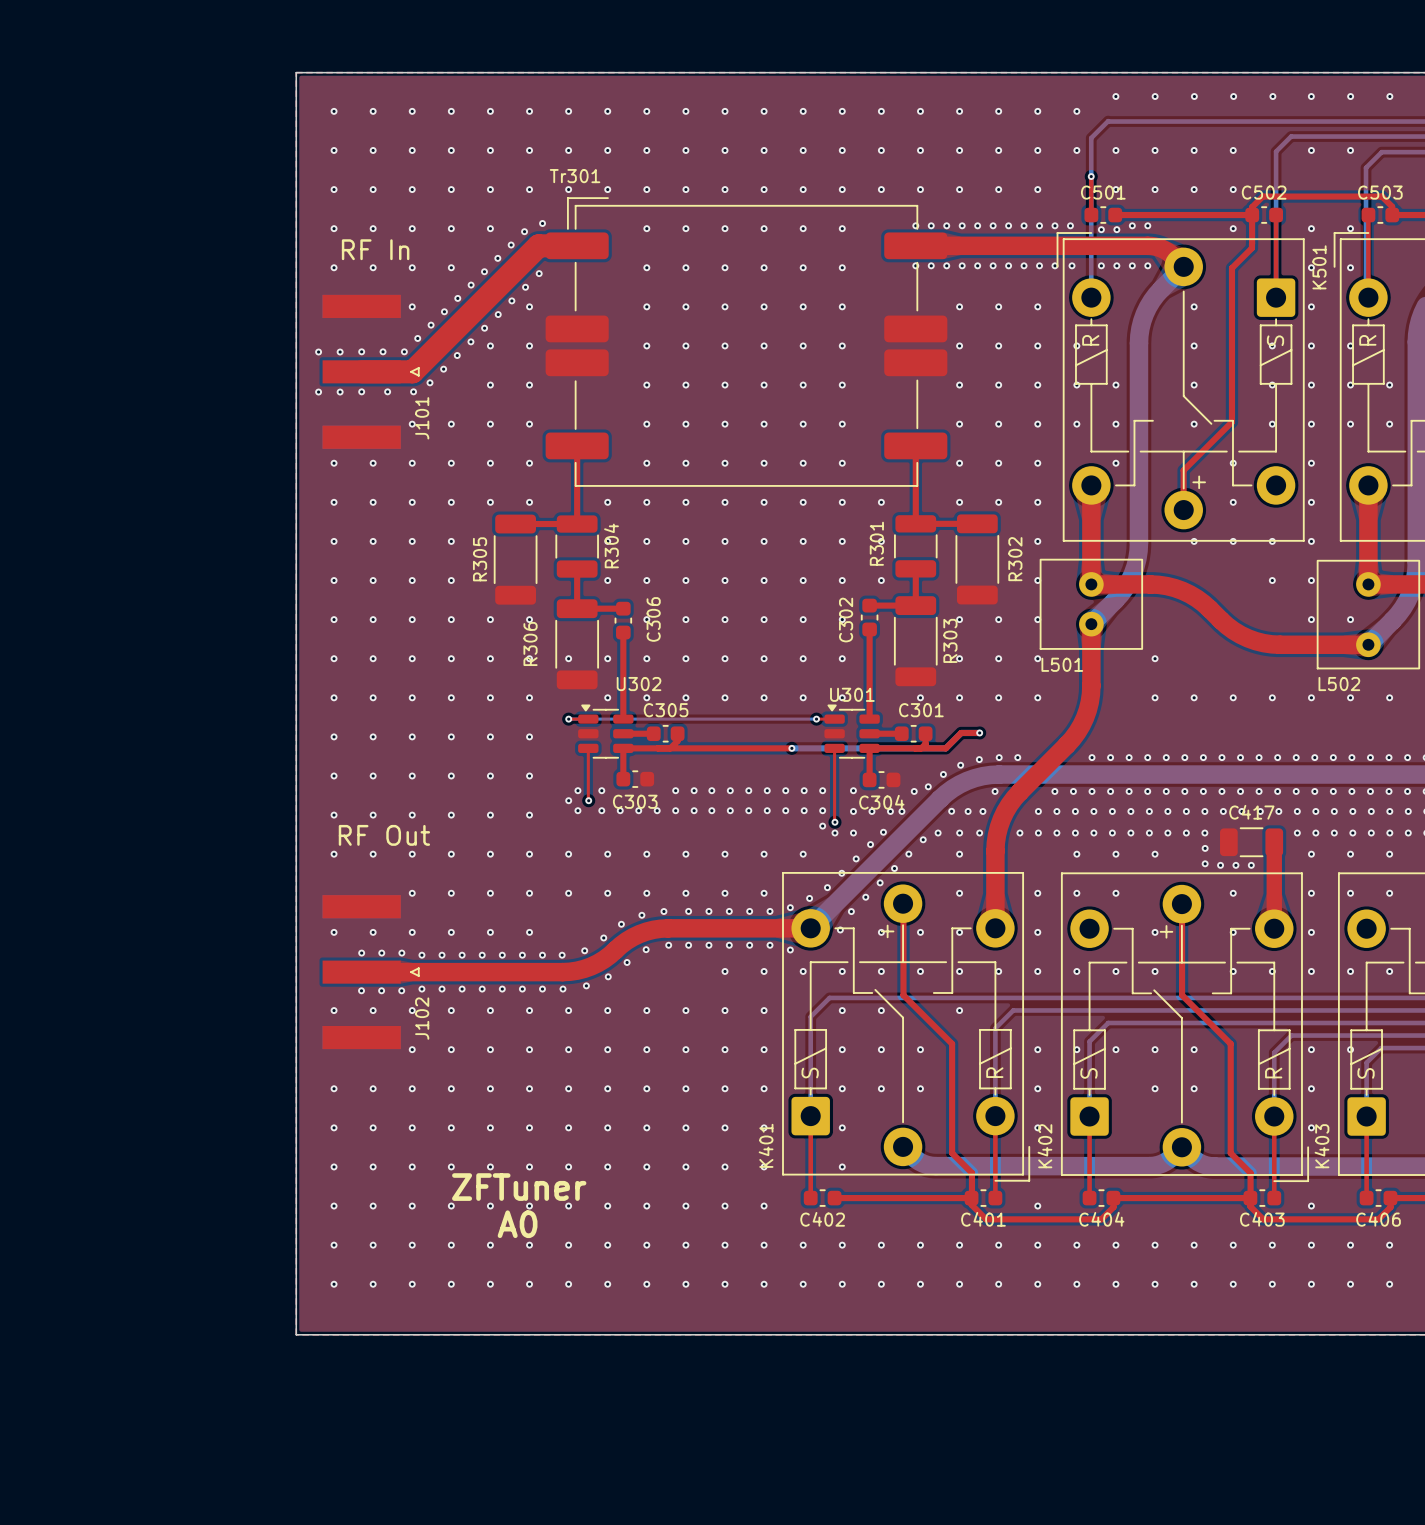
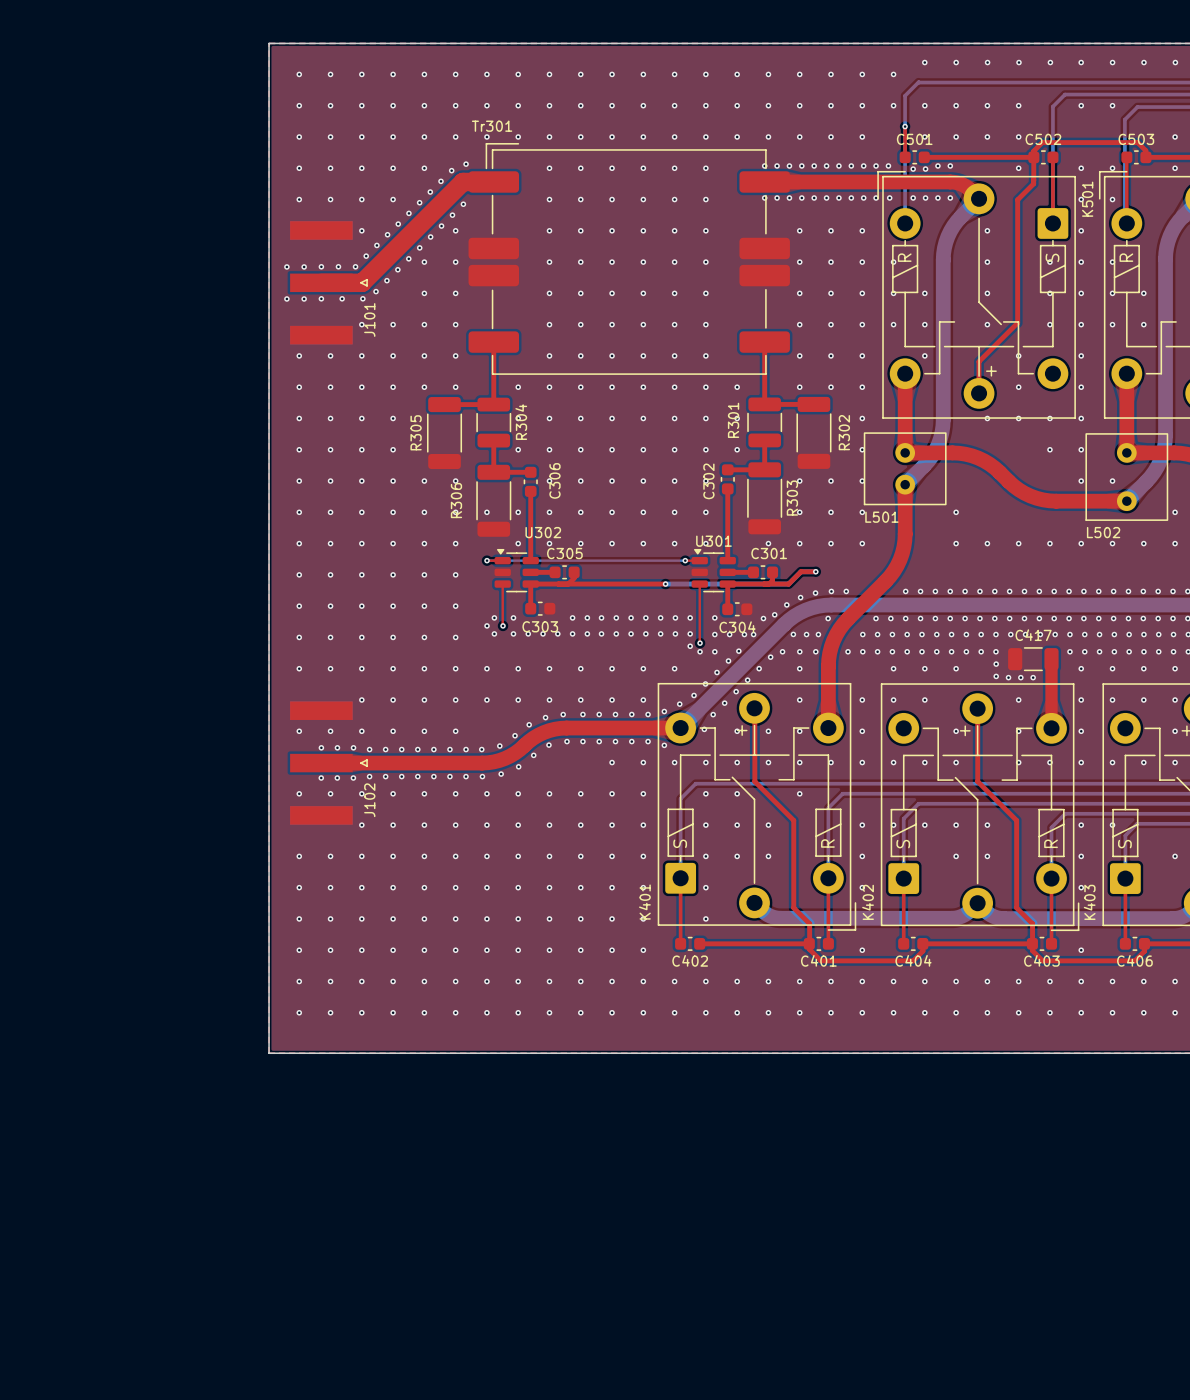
text: RF In (375, 249) -> none
text: RF Out (384, 835) -> none
text: ZFTuner (519, 1187) -> none
text: A0 (517, 1224) -> none

